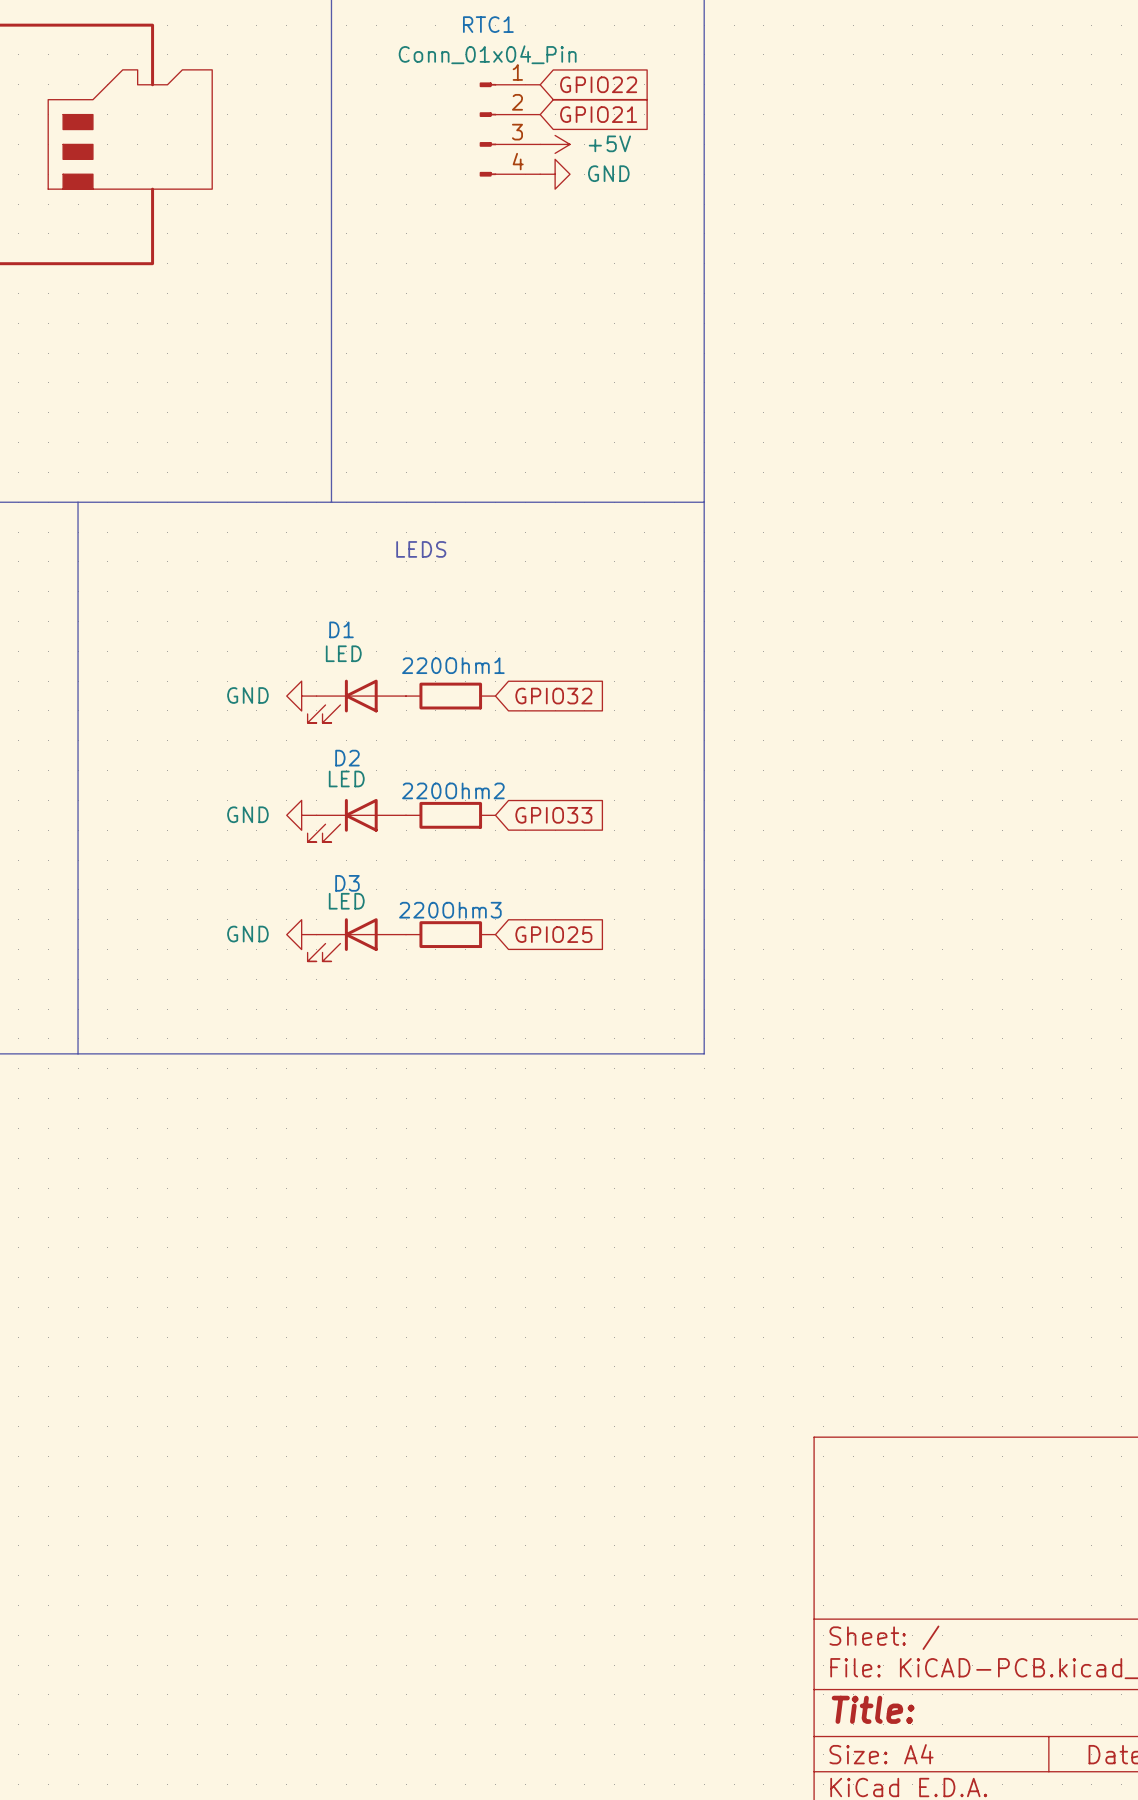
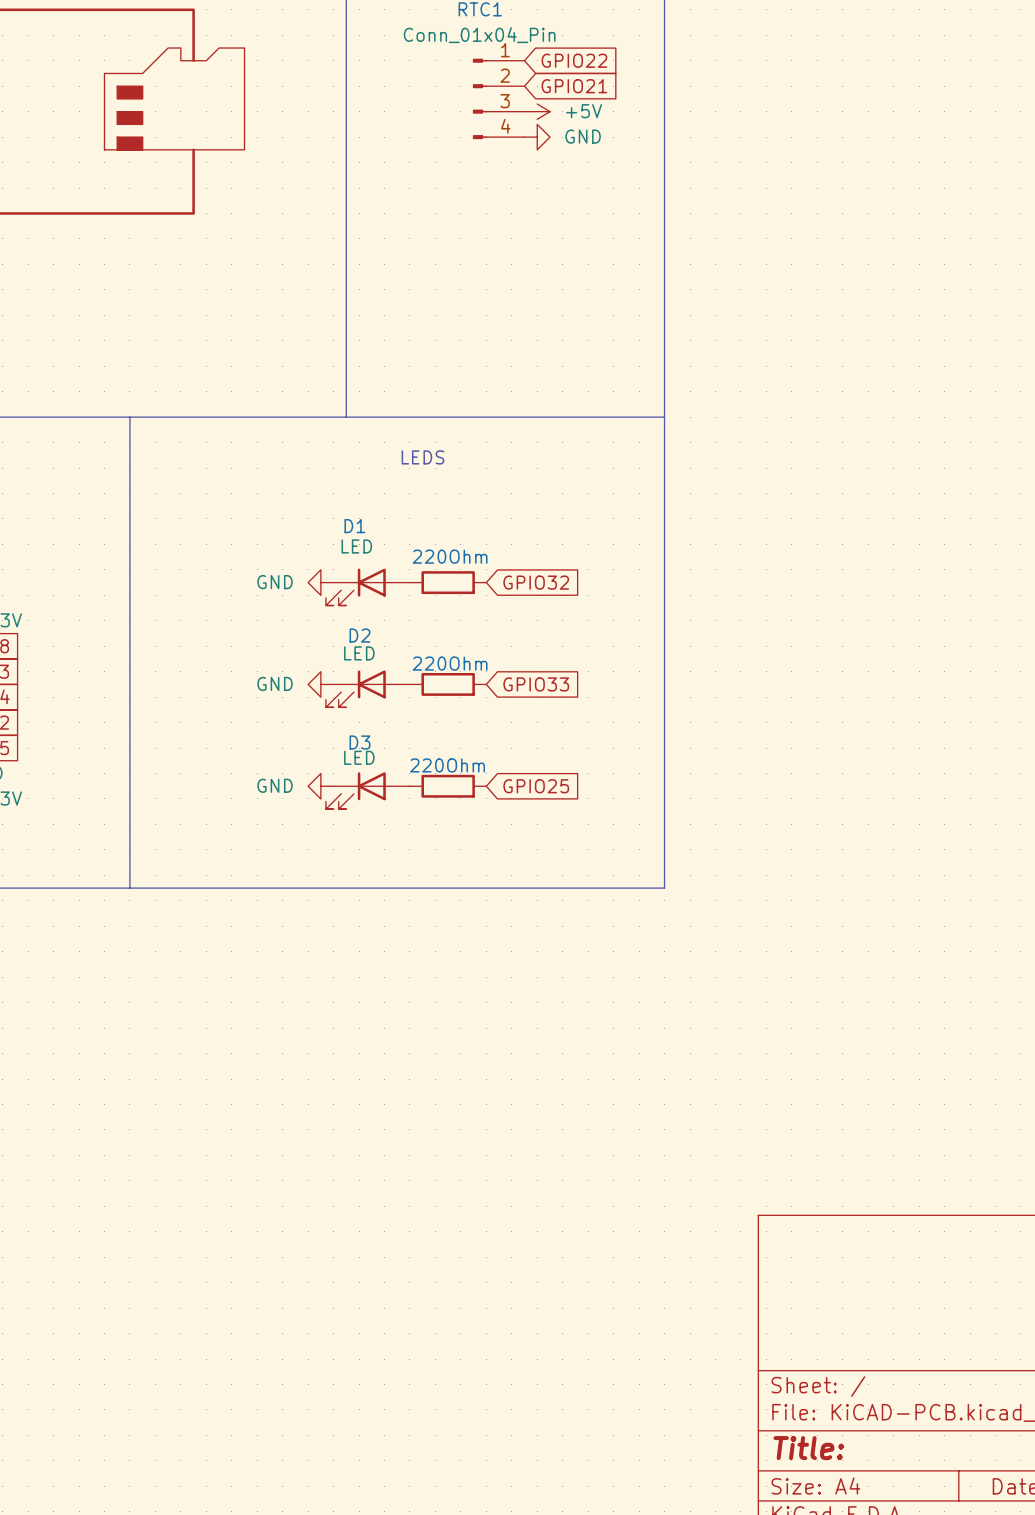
220Ohm1 name: 220Ohm1 (453, 665) -> 220Ohm (450, 556)
220Ohm2 name: 220Ohm2 (453, 790) -> 220Ohm (450, 663)
220Ohm3 name: 220Ohm3 (450, 910) -> 220Ohm (447, 765)

